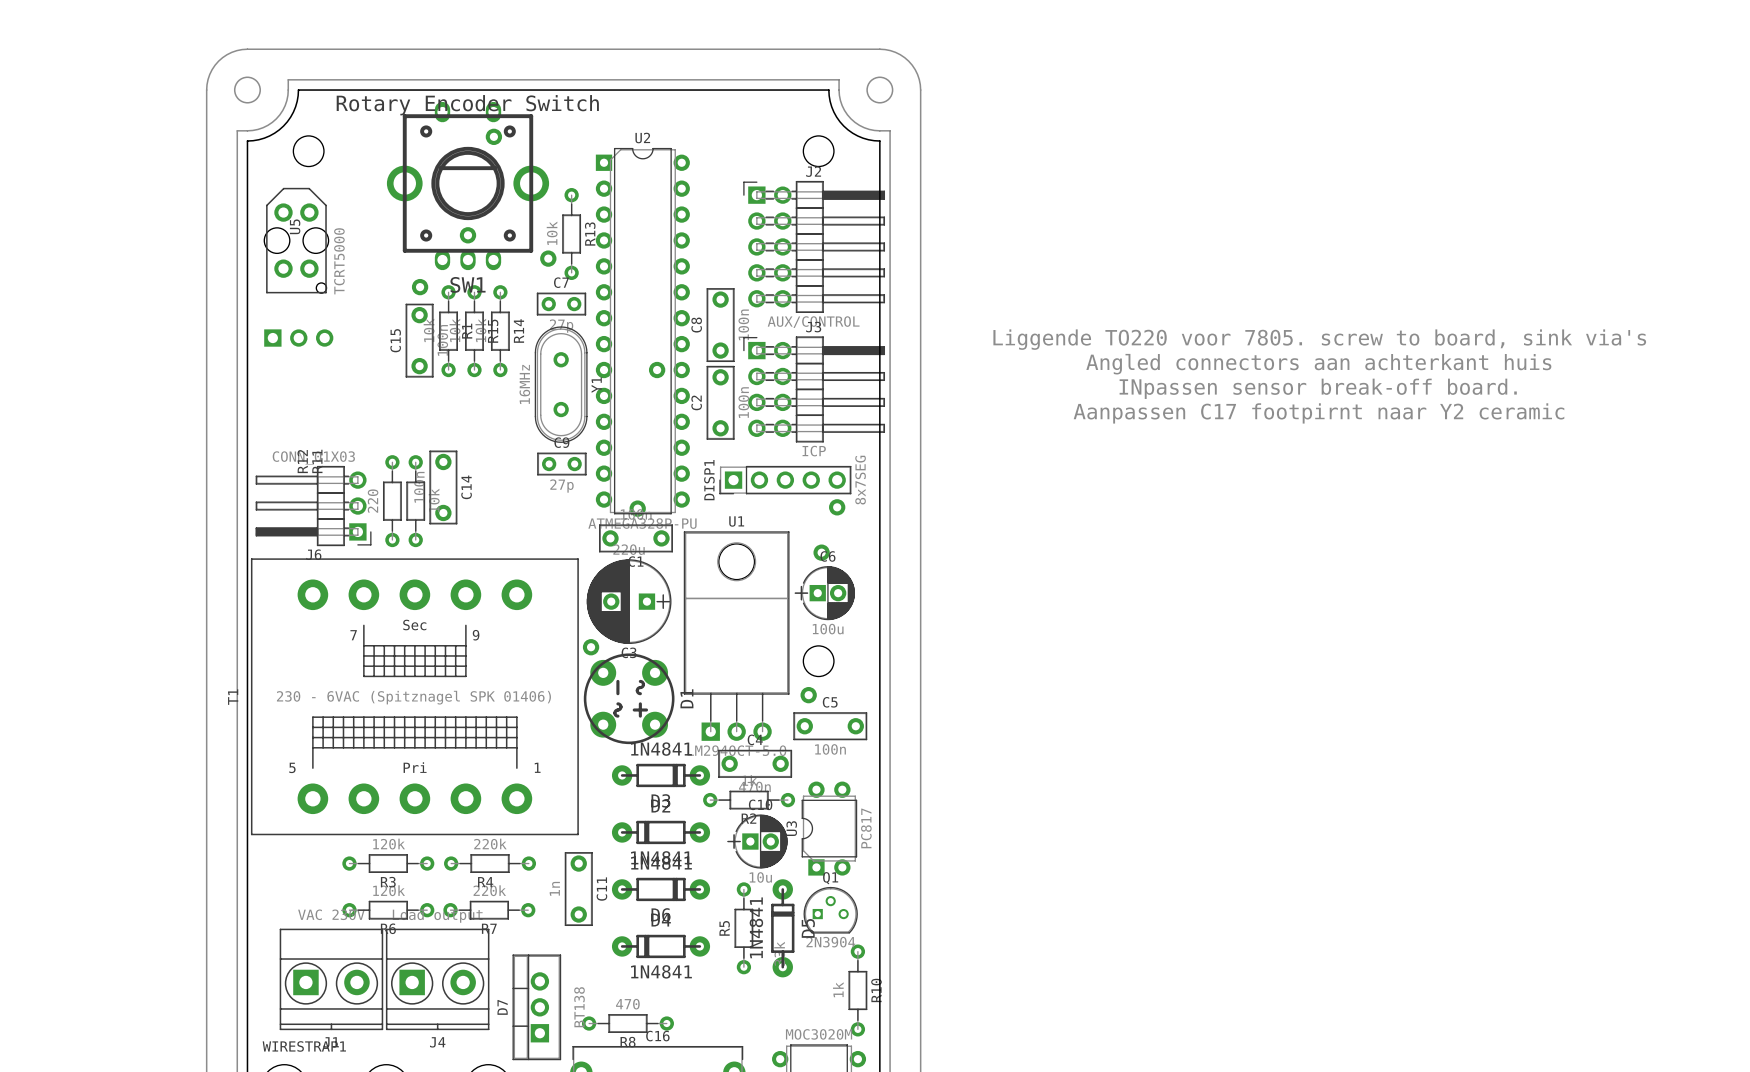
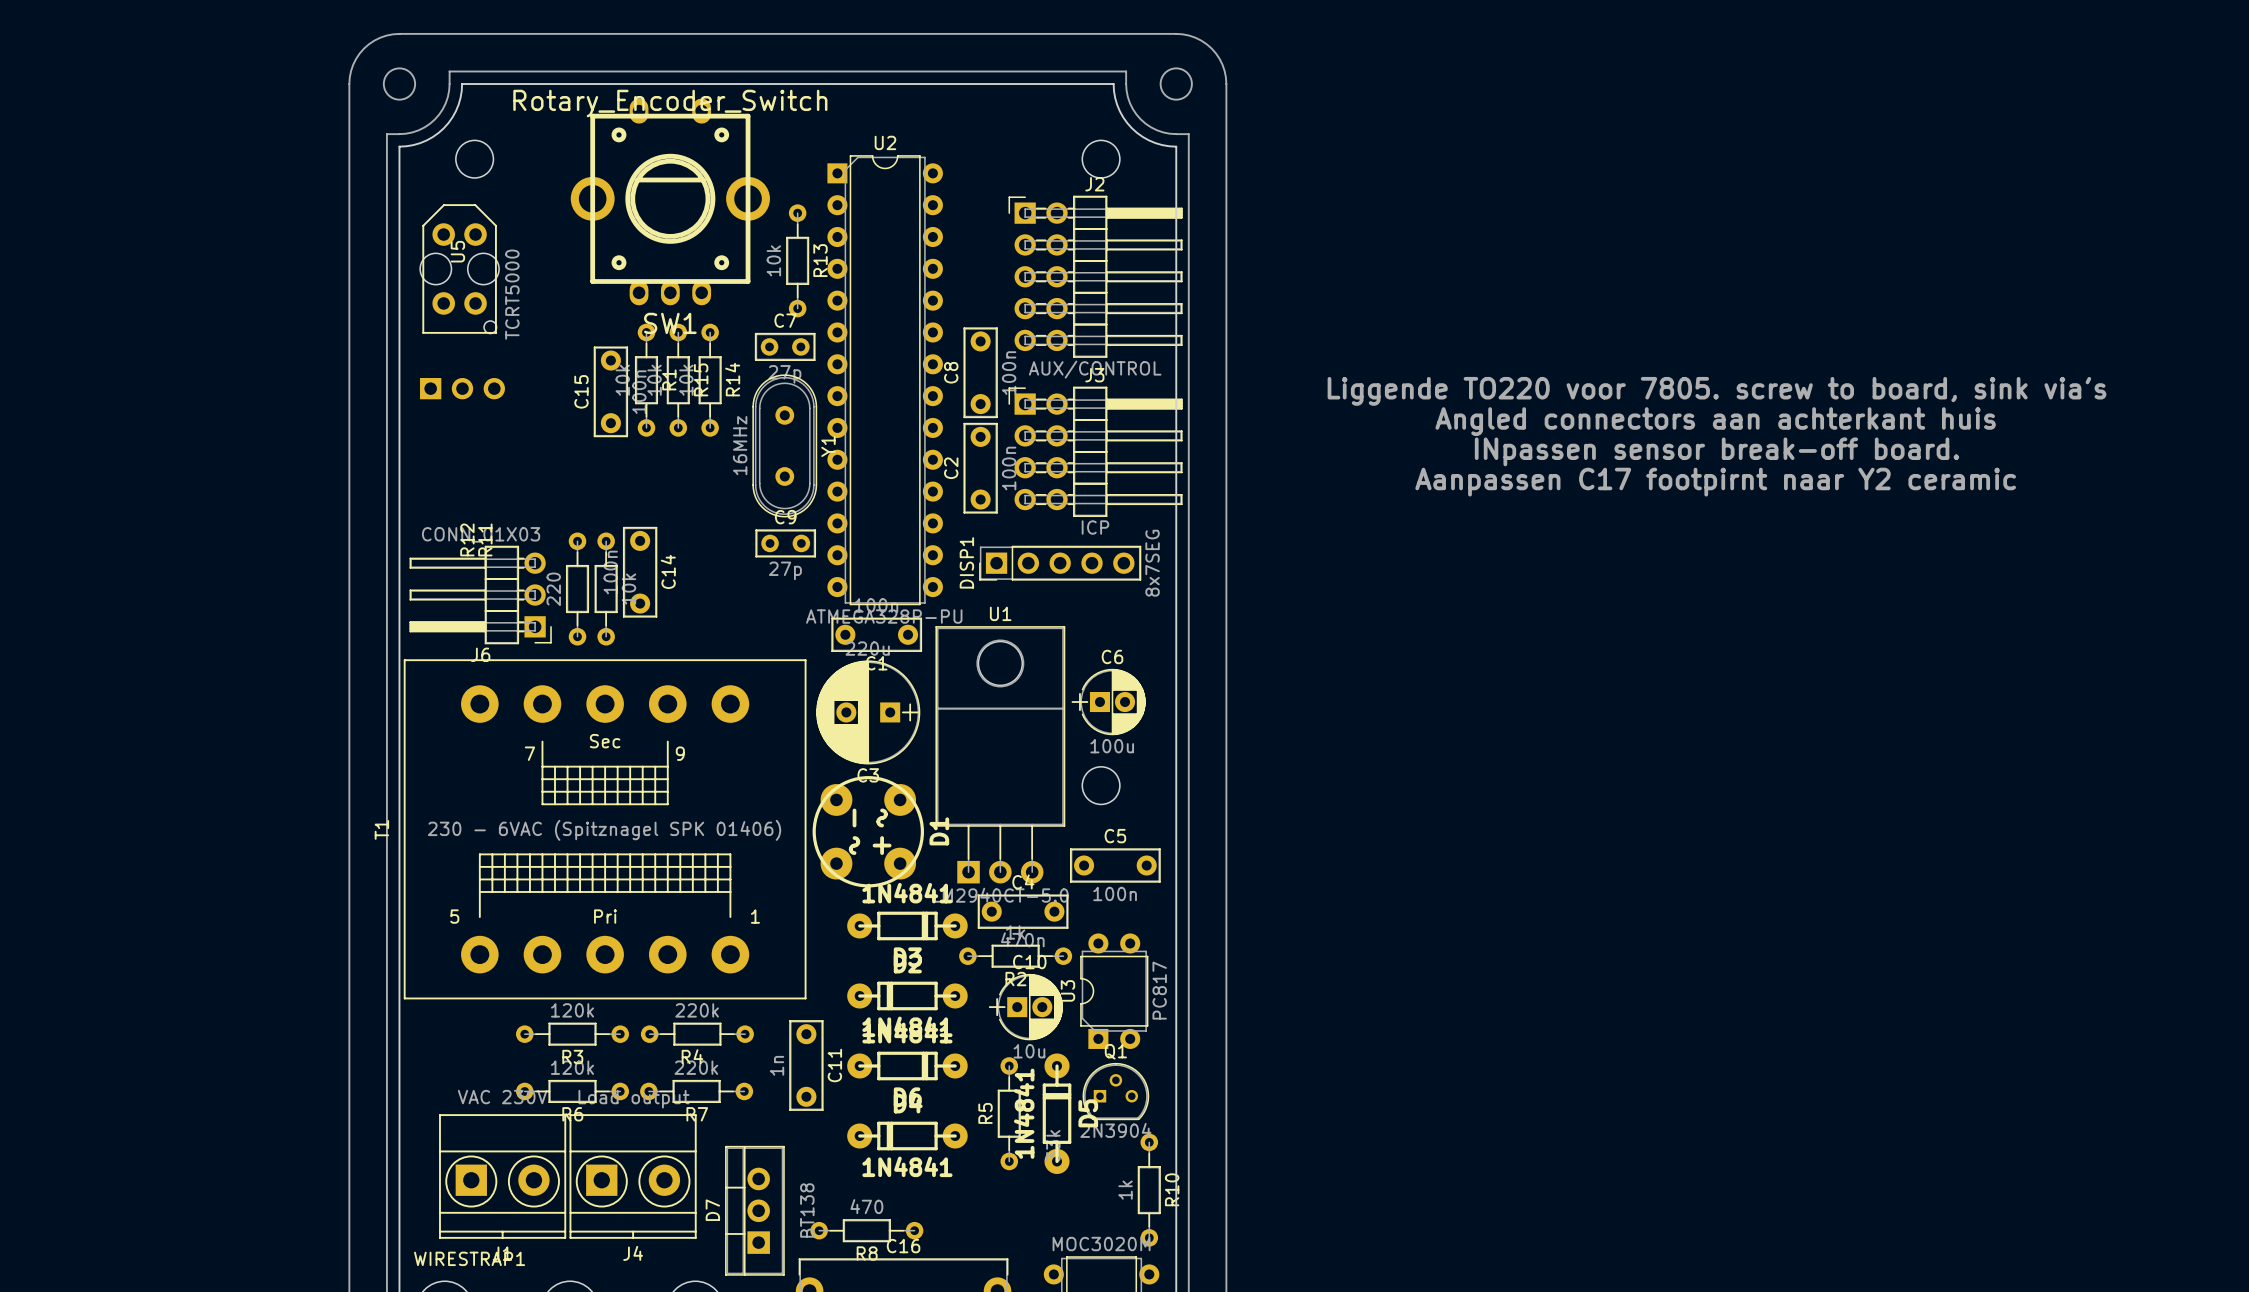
part: (493, 136) -> none
part: (468, 235) -> none
part: (548, 258) -> none
part: (420, 287) -> none
part: (657, 370) -> none
part: (837, 507) -> none
part: (637, 508) -> none
part: (821, 552) -> none
part: (591, 647) -> none
part: (808, 695) -> none

